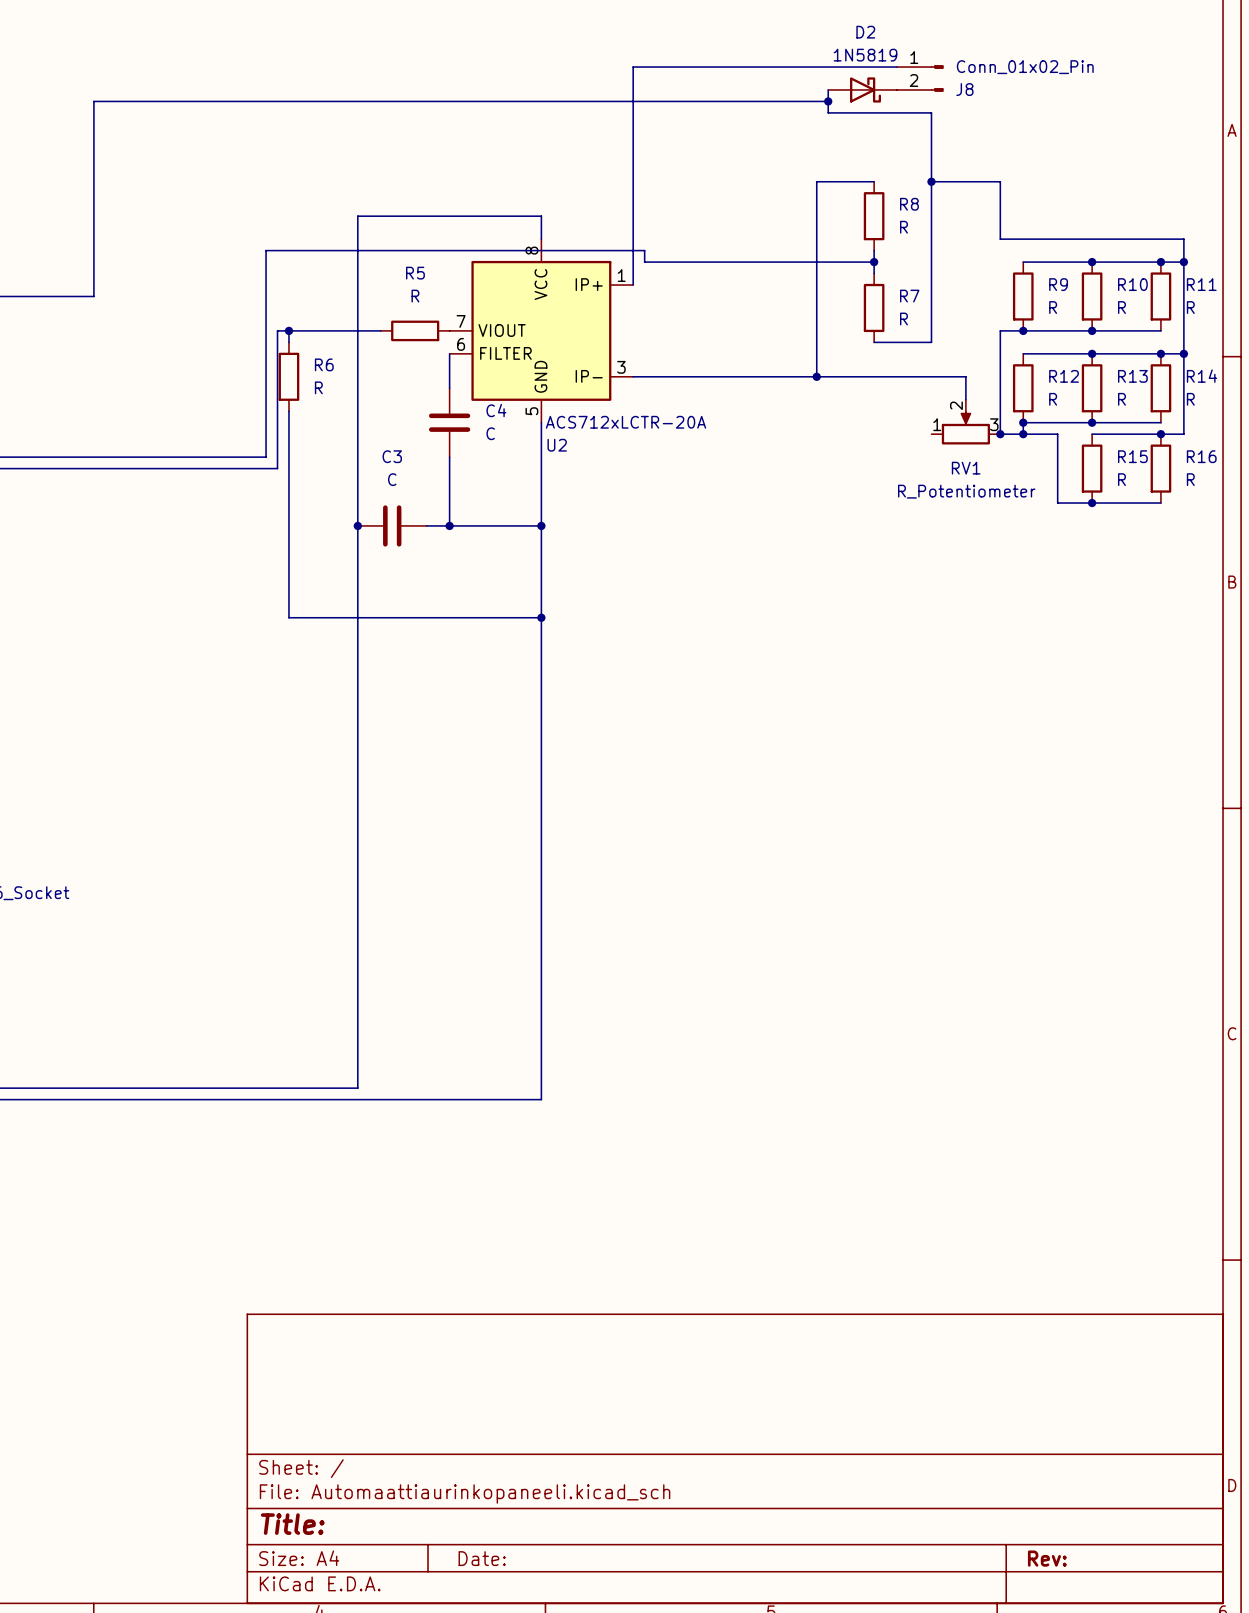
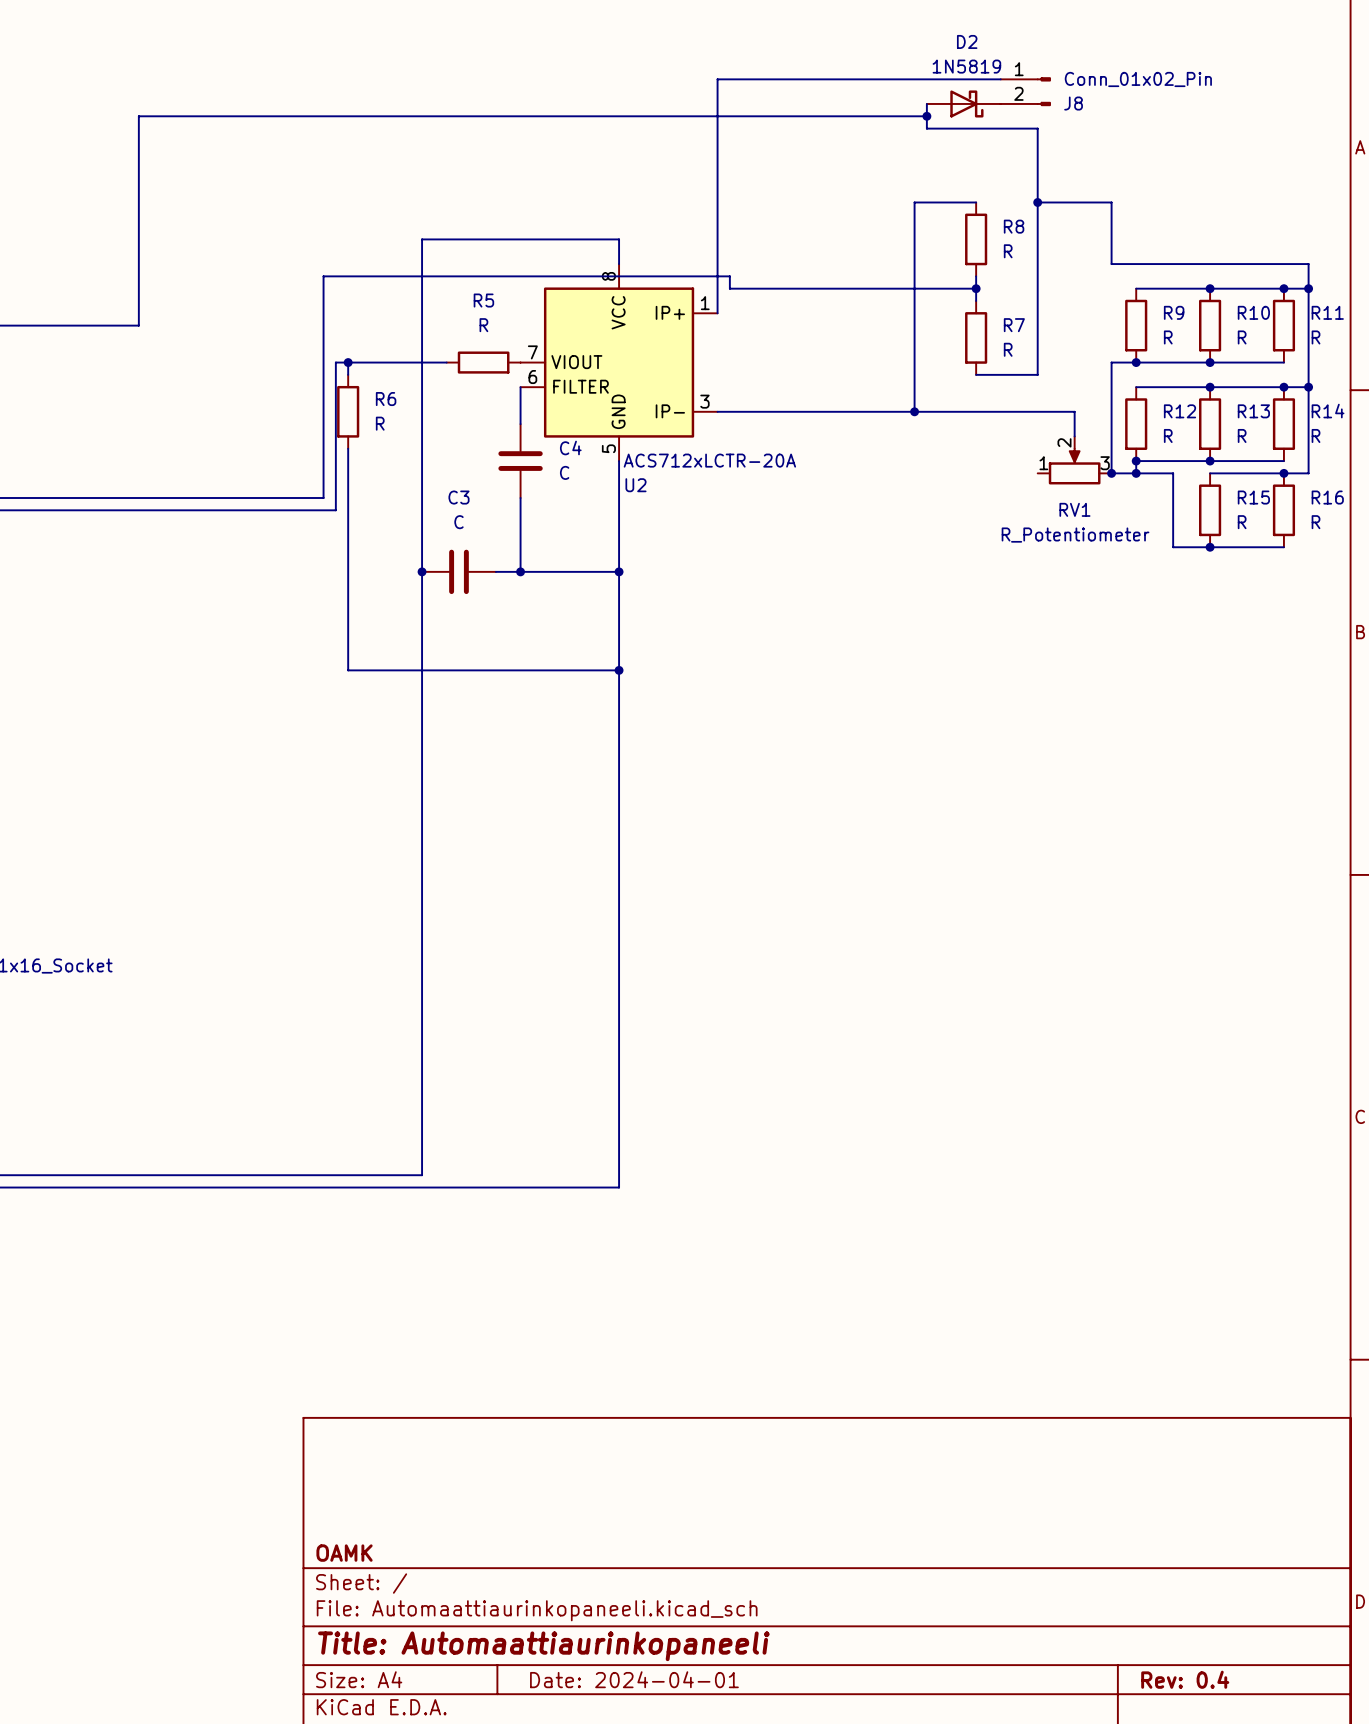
title block: none -> OAMK (344, 1553)
title block: Title: (292, 1524) -> Title: Automaattiaurinkopaneeli (543, 1646)
title block: Date: (482, 1558) -> Date: 2024-04-01 (634, 1679)
title block: Rev: (1047, 1558) -> Rev: 0.4 (1185, 1679)

